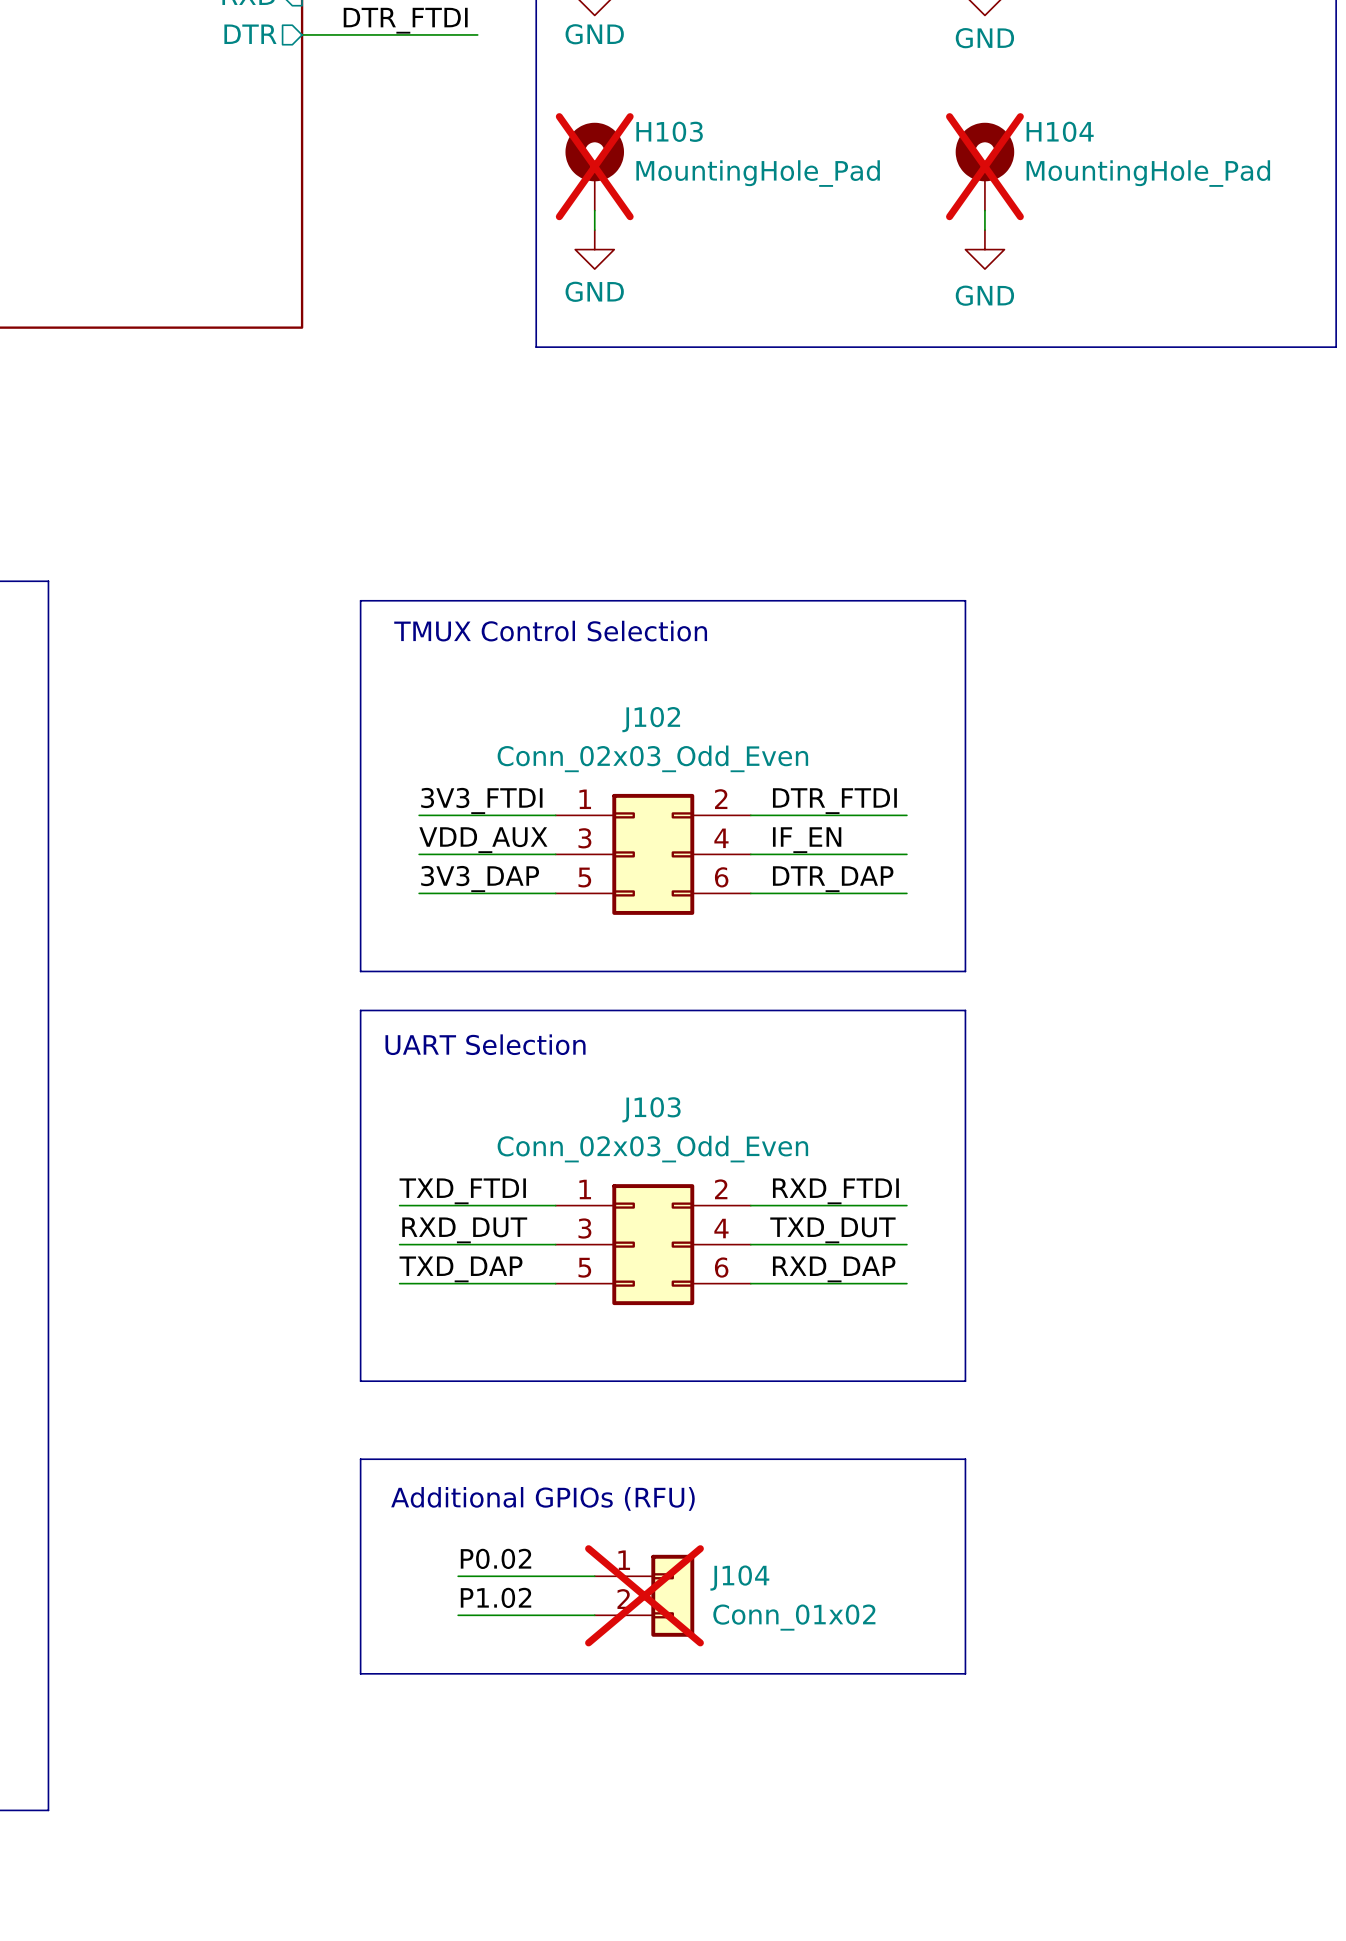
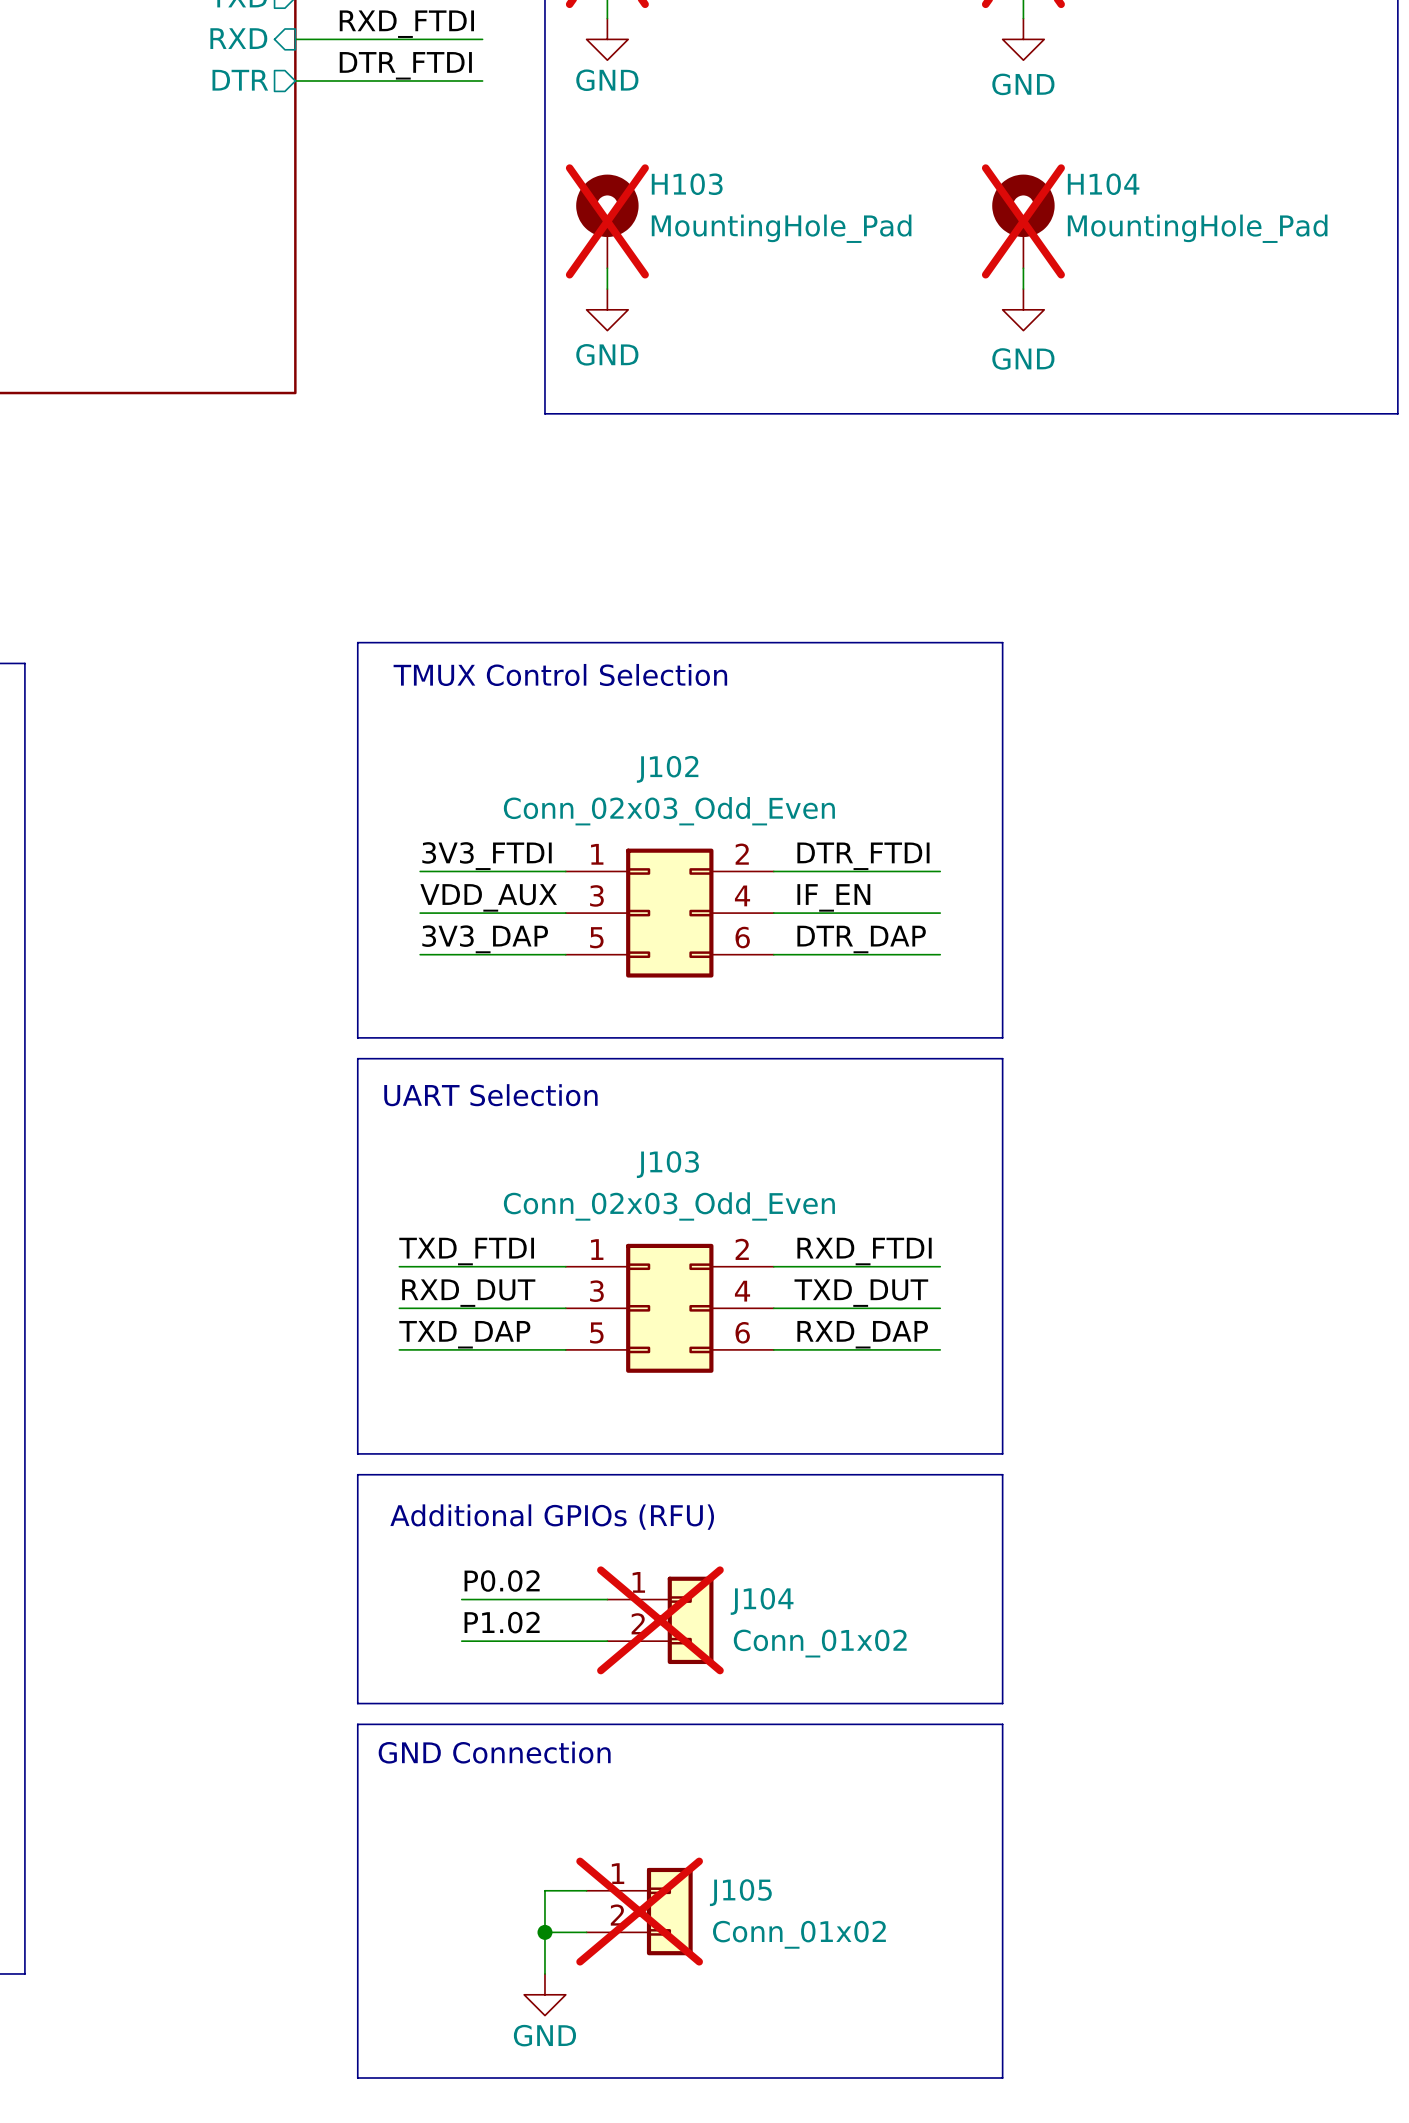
line: (360, 600) (965, 600) -> (357, 684) (357, 642) (1002, 642) (1002, 684)
text position: TMUX Control Selection (550, 631) -> TMUX Control Selection (560, 674)
label: none -> 3V3_FTDI (487, 856)
label: none -> DTR_FTDI (863, 856)
label: 3V3_FTDI (481, 800) -> VDD_AUX (488, 897)
label: DTR_FTDI (834, 801) -> IF_EN (833, 897)
label: VDD_AUX (483, 840) -> 3V3_DAP (485, 939)
label: IF_EN (807, 840) -> DTR_DAP (861, 939)
J102 position: (653, 854) -> (669, 913)
label: 3V3_DAP (480, 878) -> none
label: DTR_DAP (833, 879) -> none
wire: (419, 893) (555, 893) -> (420, 871) (565, 871)
wire: (750, 893) (906, 893) -> (773, 871) (940, 871)
line: (360, 932) (360, 951) -> (357, 1037) (1002, 1037)
line: (965, 932) (965, 951) -> (357, 1058) (1002, 1058)
line: (360, 971) (965, 971) -> (357, 1079) (357, 1121)
line: (360, 1010) (965, 1010) -> (1002, 1079) (1002, 1121)
text position: UART Selection (485, 1044) -> UART Selection (490, 1095)
label position: TXD_FTDI (462, 1191) -> TXD_FTDI (466, 1251)
label position: RXD_FTDI (835, 1191) -> RXD_FTDI (864, 1251)
wire: (399, 1205) (555, 1205) -> (399, 1266) (565, 1266)
wire: (750, 1205) (906, 1205) -> (773, 1266) (940, 1266)
label position: RXD_DUT (464, 1230) -> RXD_DUT (468, 1293)
label position: TXD_DUT (832, 1230) -> TXD_DUT (861, 1293)
wire: (399, 1244) (555, 1244) -> (399, 1308) (565, 1308)
J103 position: (653, 1244) -> (669, 1308)
wire: (750, 1244) (906, 1244) -> (773, 1308) (940, 1308)
label position: TXD_DAP (461, 1269) -> TXD_DAP (464, 1334)
label position: RXD_DAP (834, 1269) -> RXD_DAP (862, 1334)
wire: (399, 1283) (555, 1283) -> (399, 1349) (565, 1349)
wire: (750, 1283) (906, 1283) -> (773, 1349) (940, 1349)
line: (360, 1322) (360, 1342) -> (357, 1453) (1002, 1453)
line: (965, 1322) (965, 1342) -> (357, 1474) (1002, 1474)
line: (360, 1381) (965, 1381) -> (357, 1516) (357, 1599)
line: (360, 1459) (965, 1459) -> (1002, 1516) (1002, 1599)
text position: Additional GPIOs (RFU) (542, 1498) -> Additional GPIOs (RFU) (552, 1517)
line: (360, 1556) (360, 1576) -> (357, 1703) (1002, 1703)
line: (965, 1556) (965, 1576) -> (357, 1724) (1002, 1724)
label position: P0.02 (496, 1558) -> P0.02 (502, 1581)
J104 position: (644, 1595) -> (660, 1620)
label position: P1.02 (496, 1597) -> P1.02 (502, 1622)
text: none -> GND Connection (494, 1752)
wire: (458, 1615) (594, 1615) -> (461, 1641) (607, 1641)
line: (360, 1673) (965, 1673) -> (357, 1828) (357, 2078) (1002, 2078) (1002, 1828)
wire: none -> (586, 1890) (544, 1890) (544, 1973)
J105: none -> Conn_01x02 (639, 1911)
wire: none -> (544, 1932) (586, 1932)
junction: none -> (544, 1932)
power symbol: none -> GND (544, 1994)

